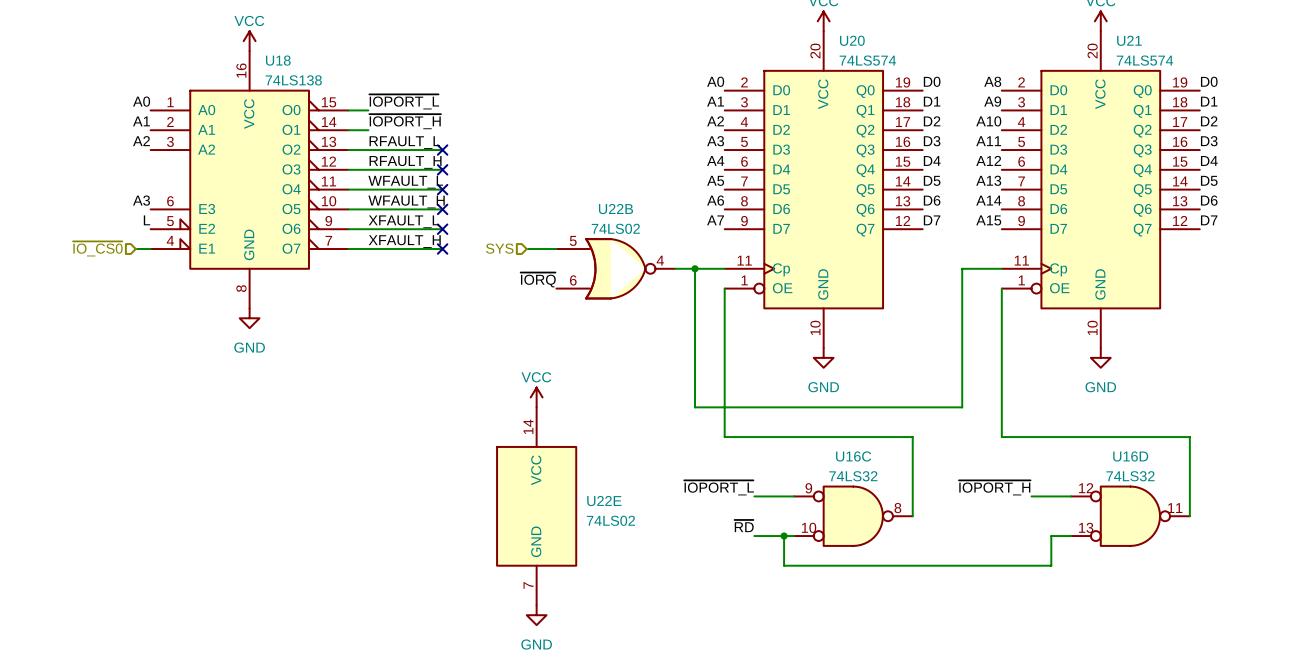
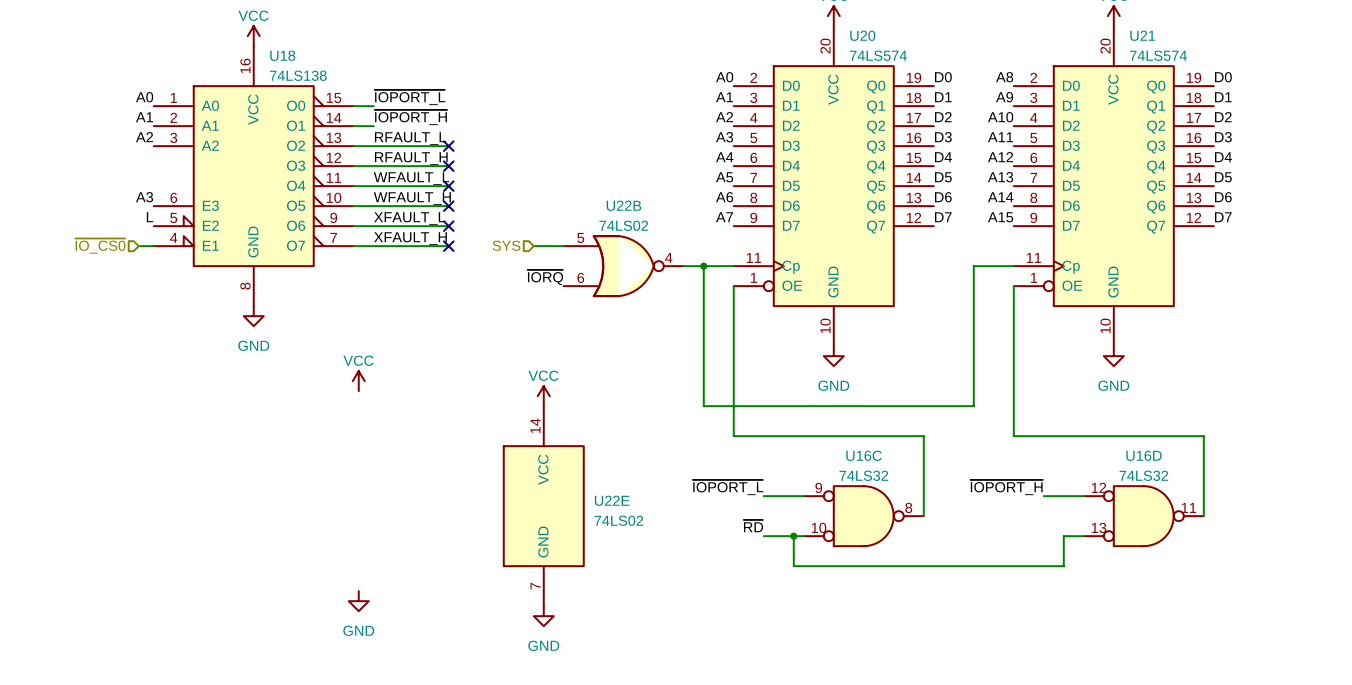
power symbol: none -> VCC (358, 381)
power symbol: none -> GND (358, 601)

